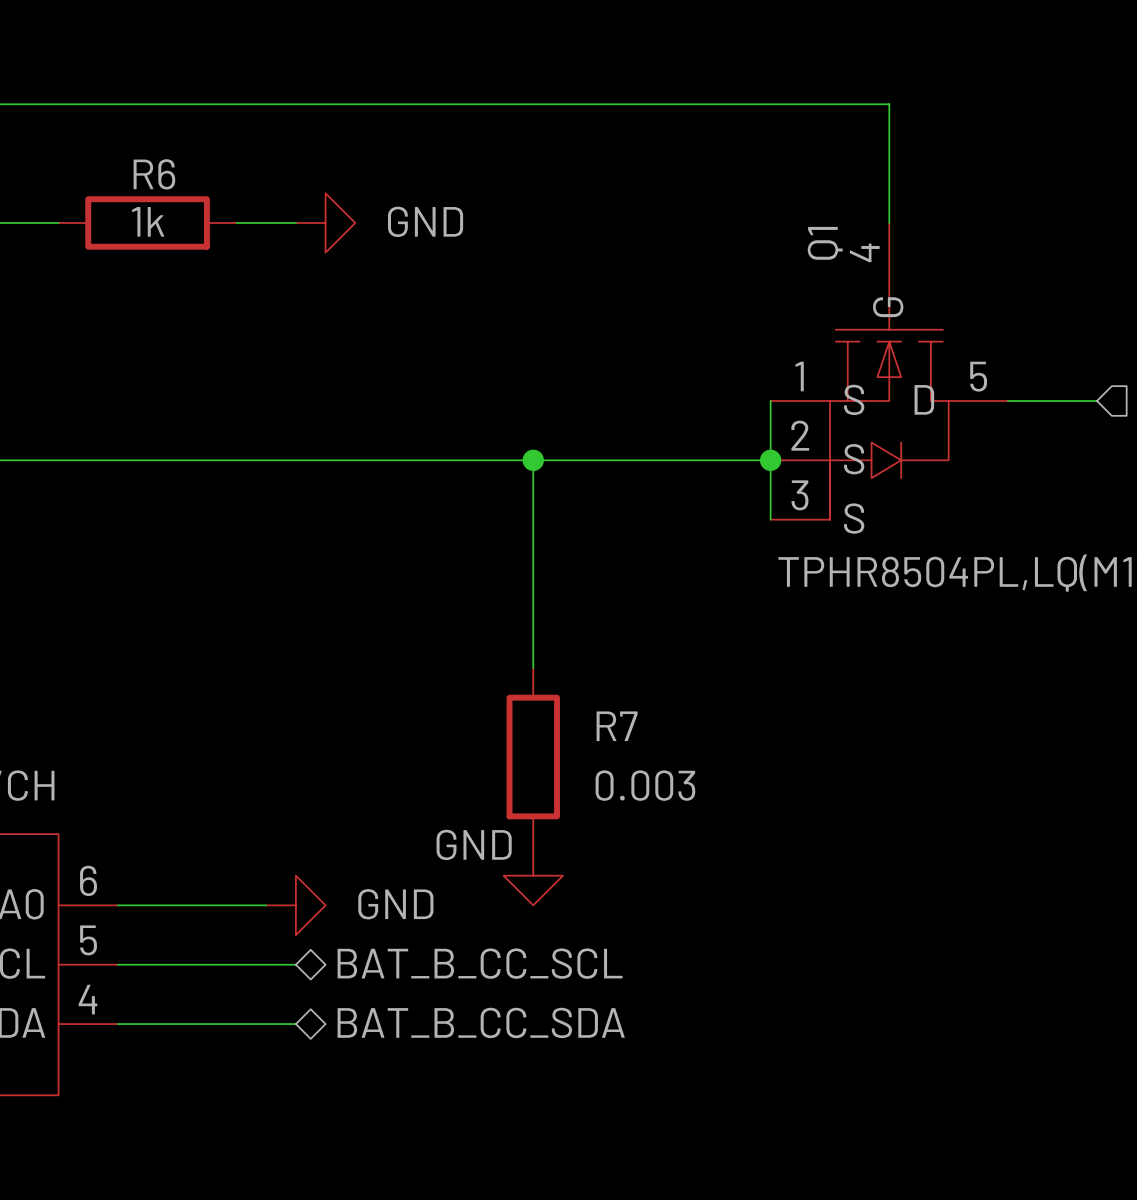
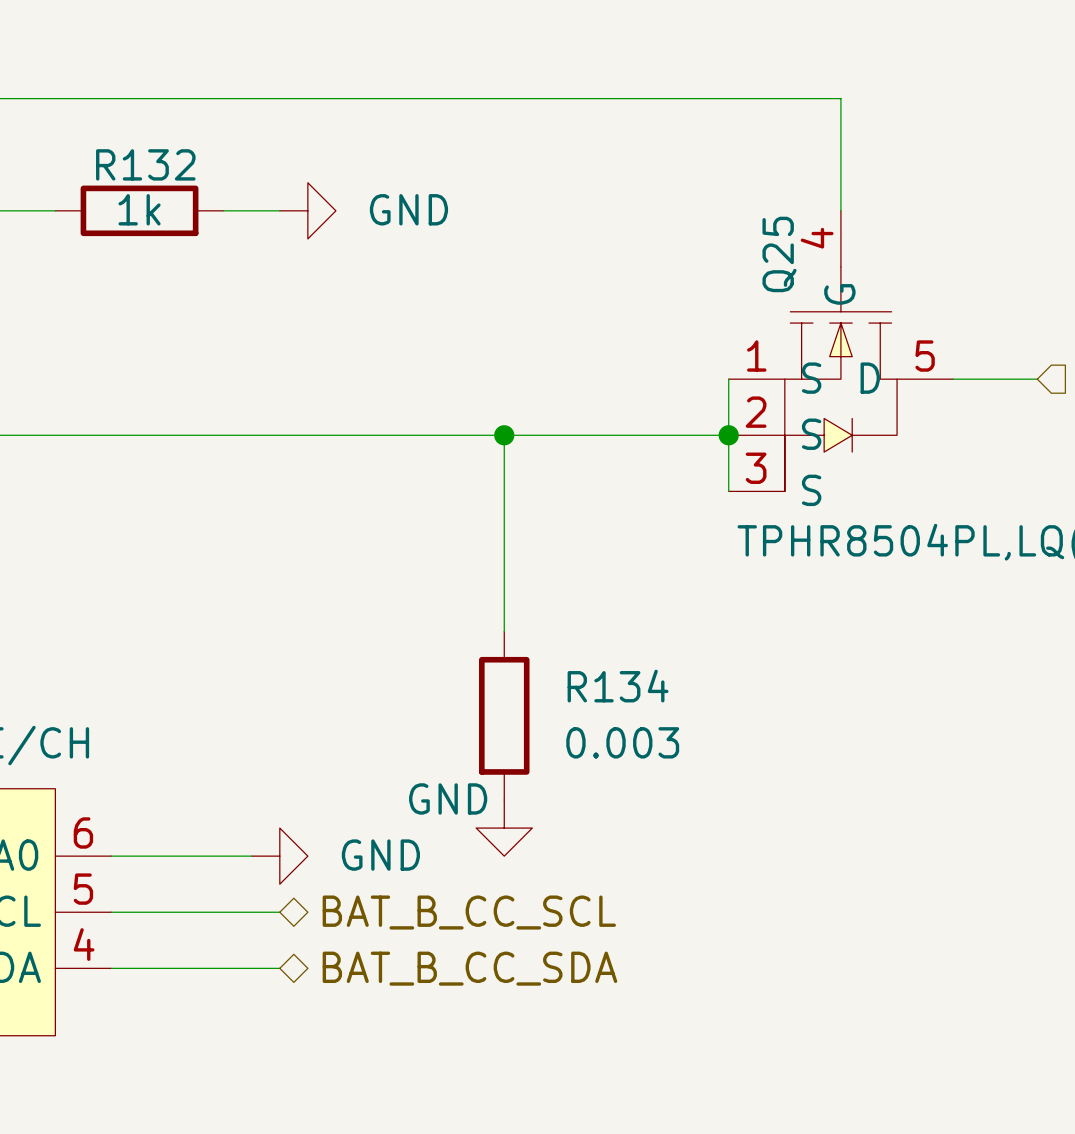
R6 name: R6 (154, 174) -> R132 (145, 164)
Q1 name: Q1 (825, 243) -> Q25 (779, 254)
R7 name: R7 (617, 726) -> R134 (618, 686)

